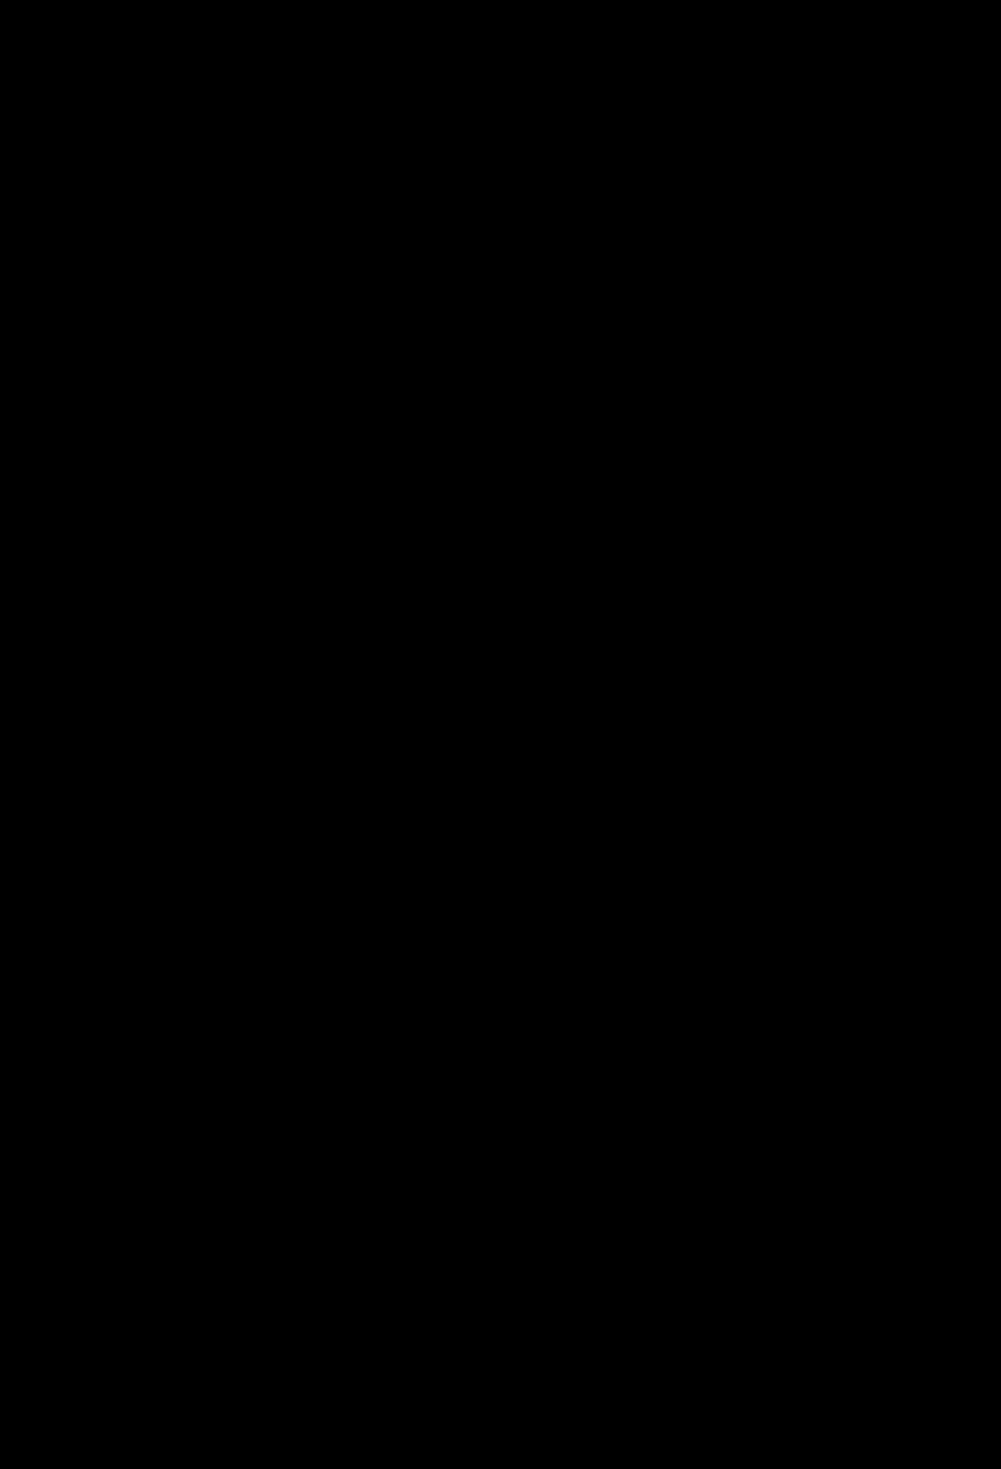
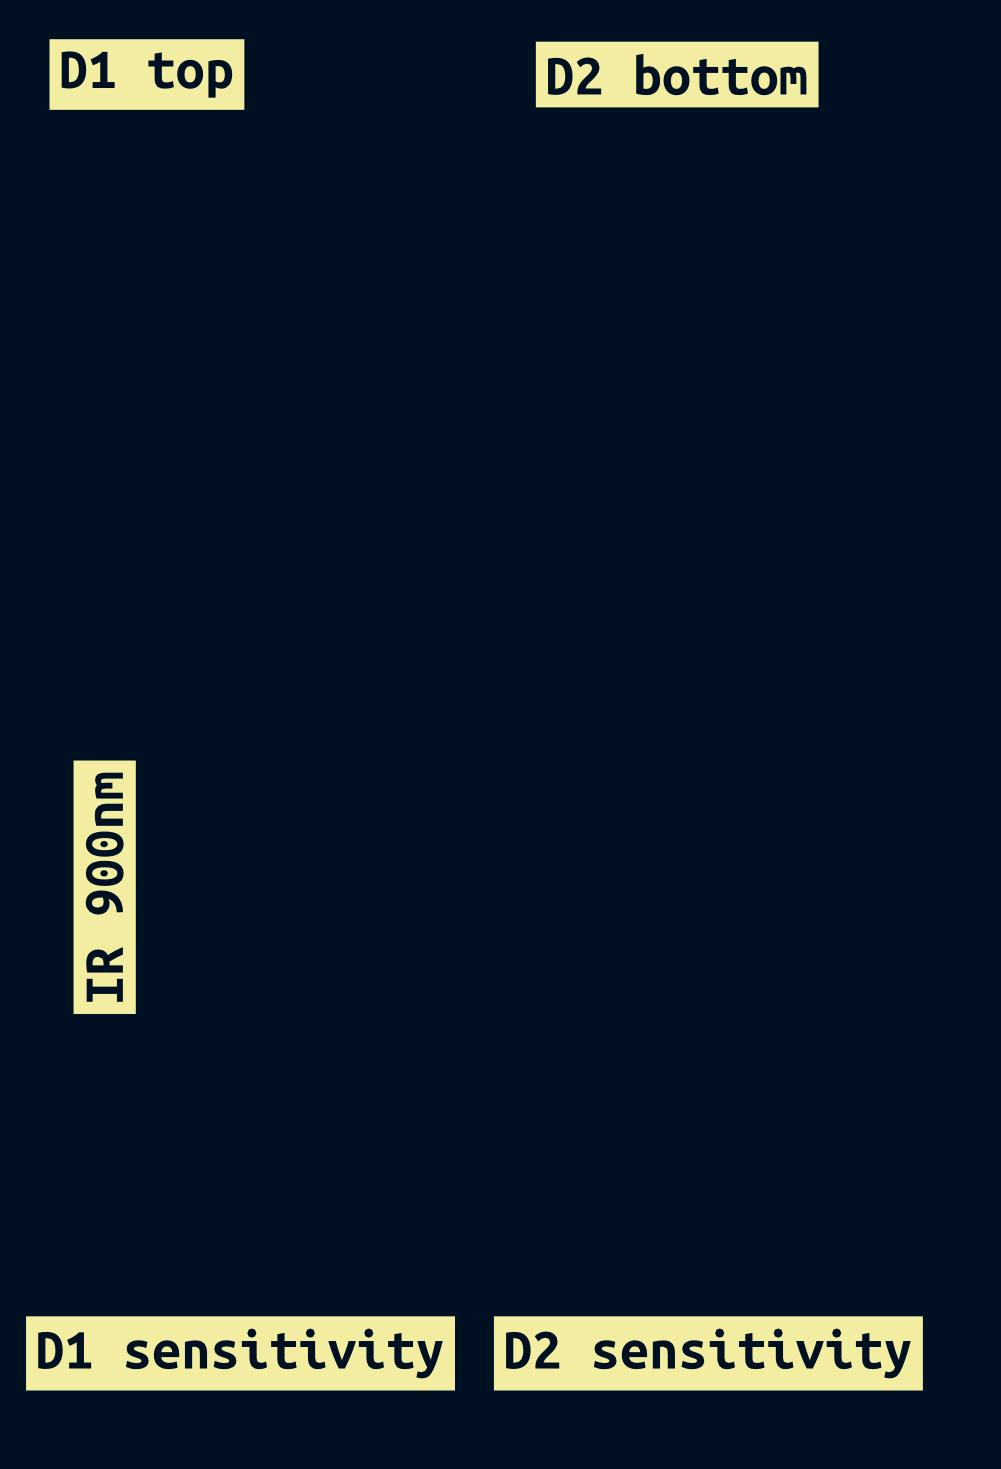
drawing: none -> [49, 39, 245, 110]
drawing: none -> [535, 41, 819, 108]
drawing: none -> [73, 760, 136, 1014]
drawing: none -> [26, 1316, 455, 1391]
drawing: none -> [493, 1316, 923, 1391]

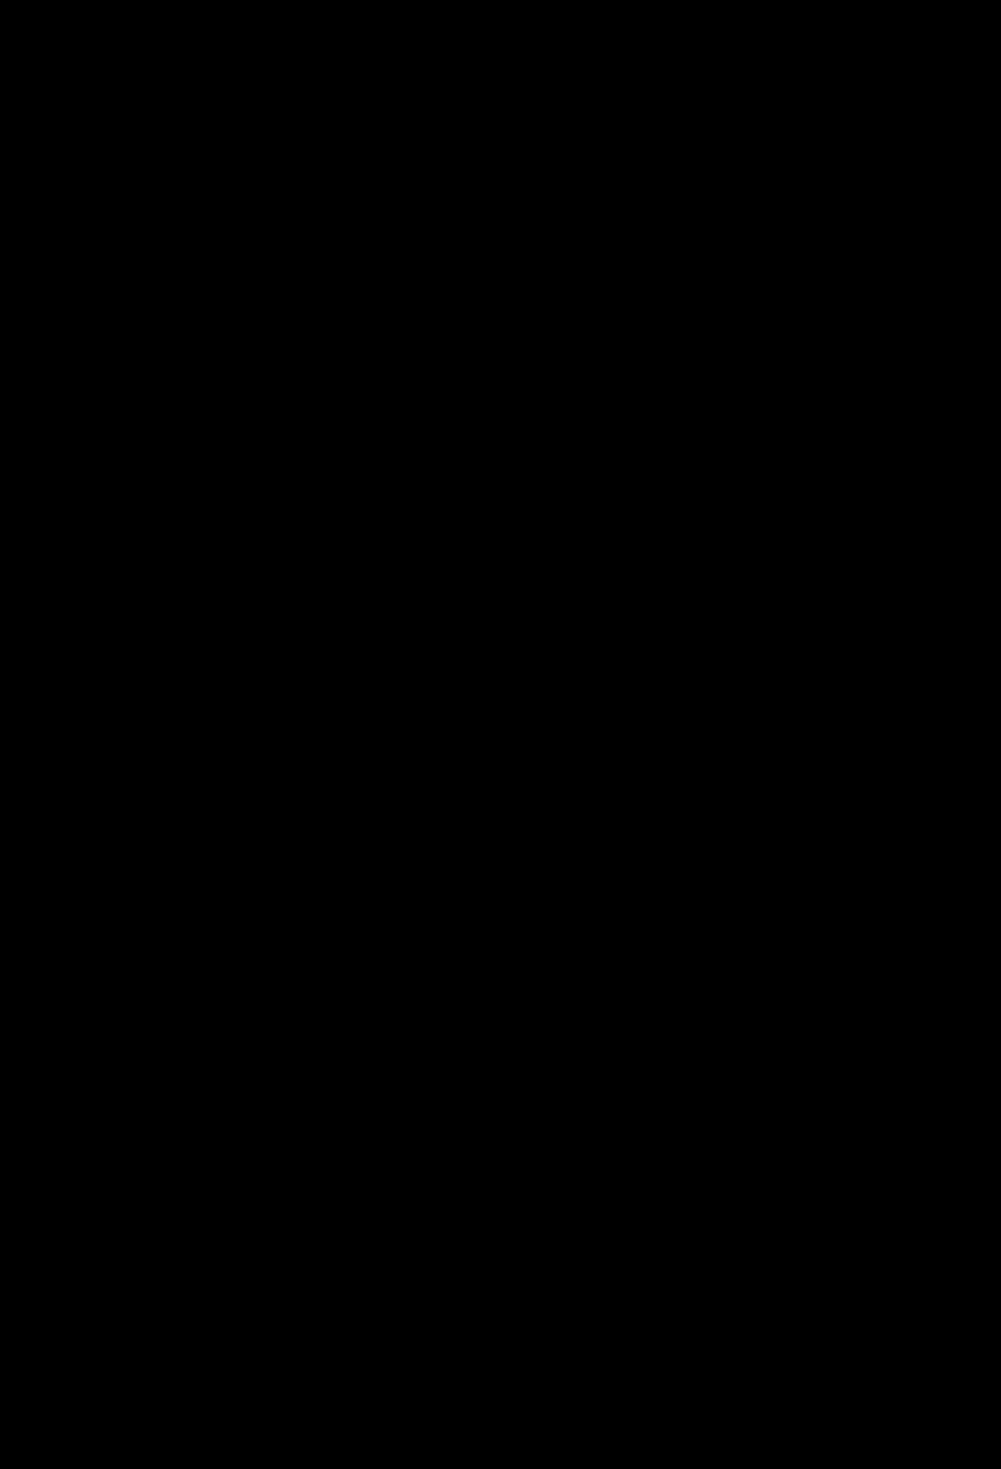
drawing: [49, 39, 245, 110] -> none
drawing: [535, 41, 819, 108] -> none
drawing: [73, 760, 136, 1014] -> none
drawing: [26, 1316, 455, 1391] -> none
drawing: [493, 1316, 923, 1391] -> none

